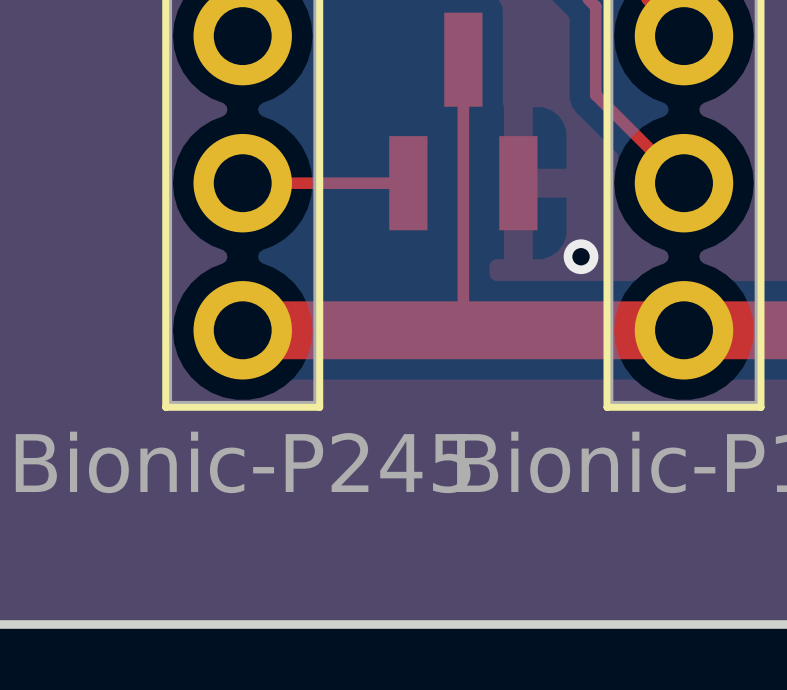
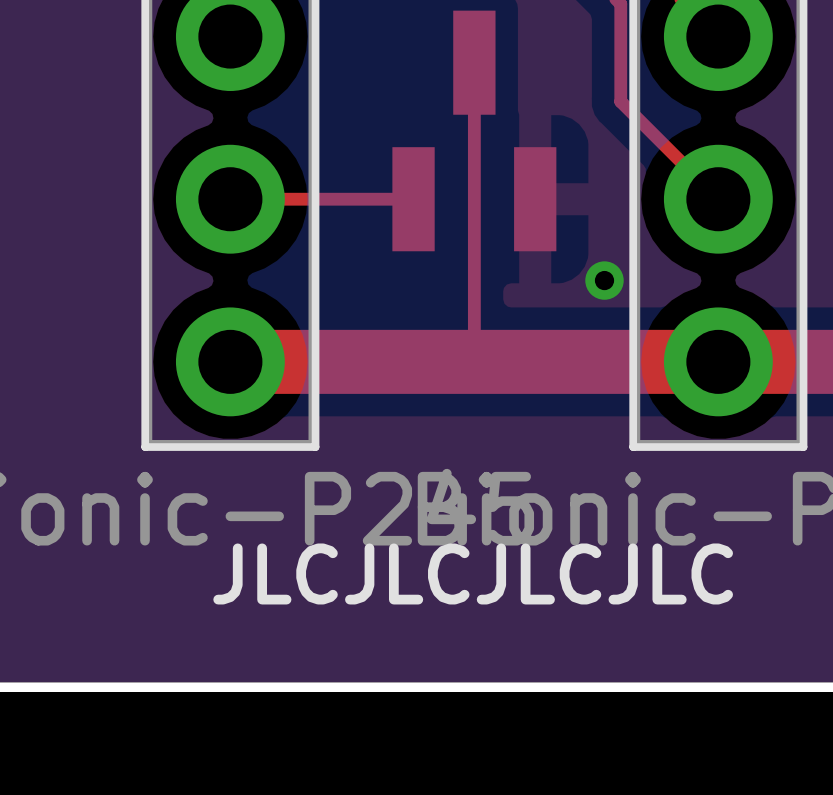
text: none -> JLCJLCJLCJLC (473, 573)

